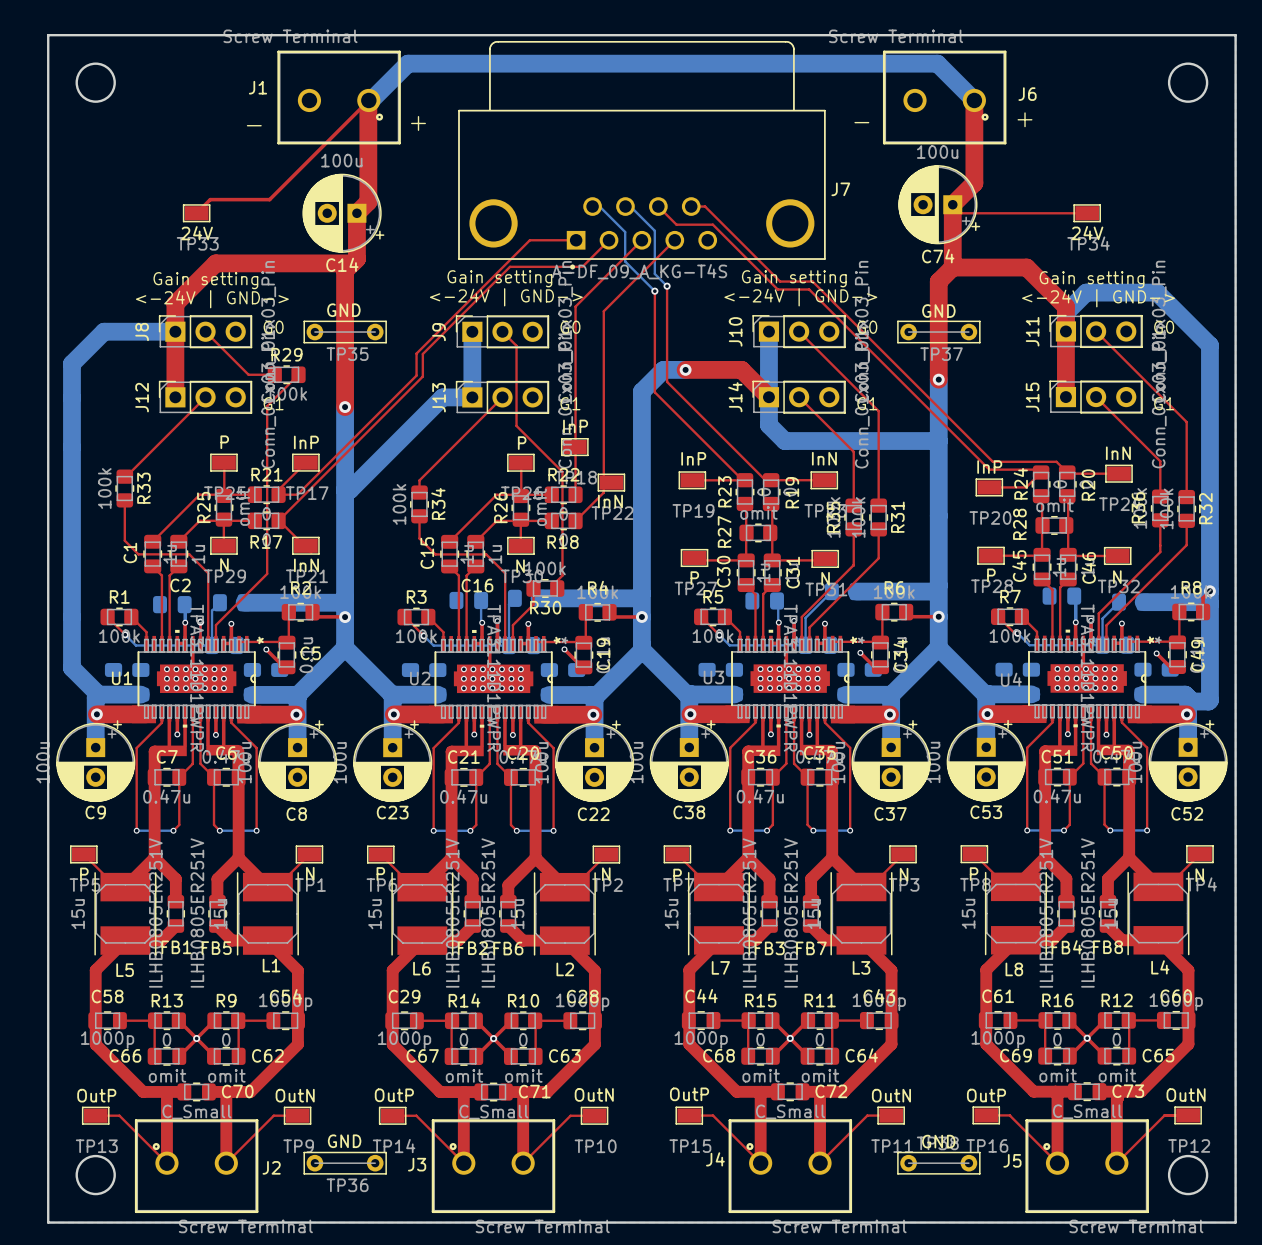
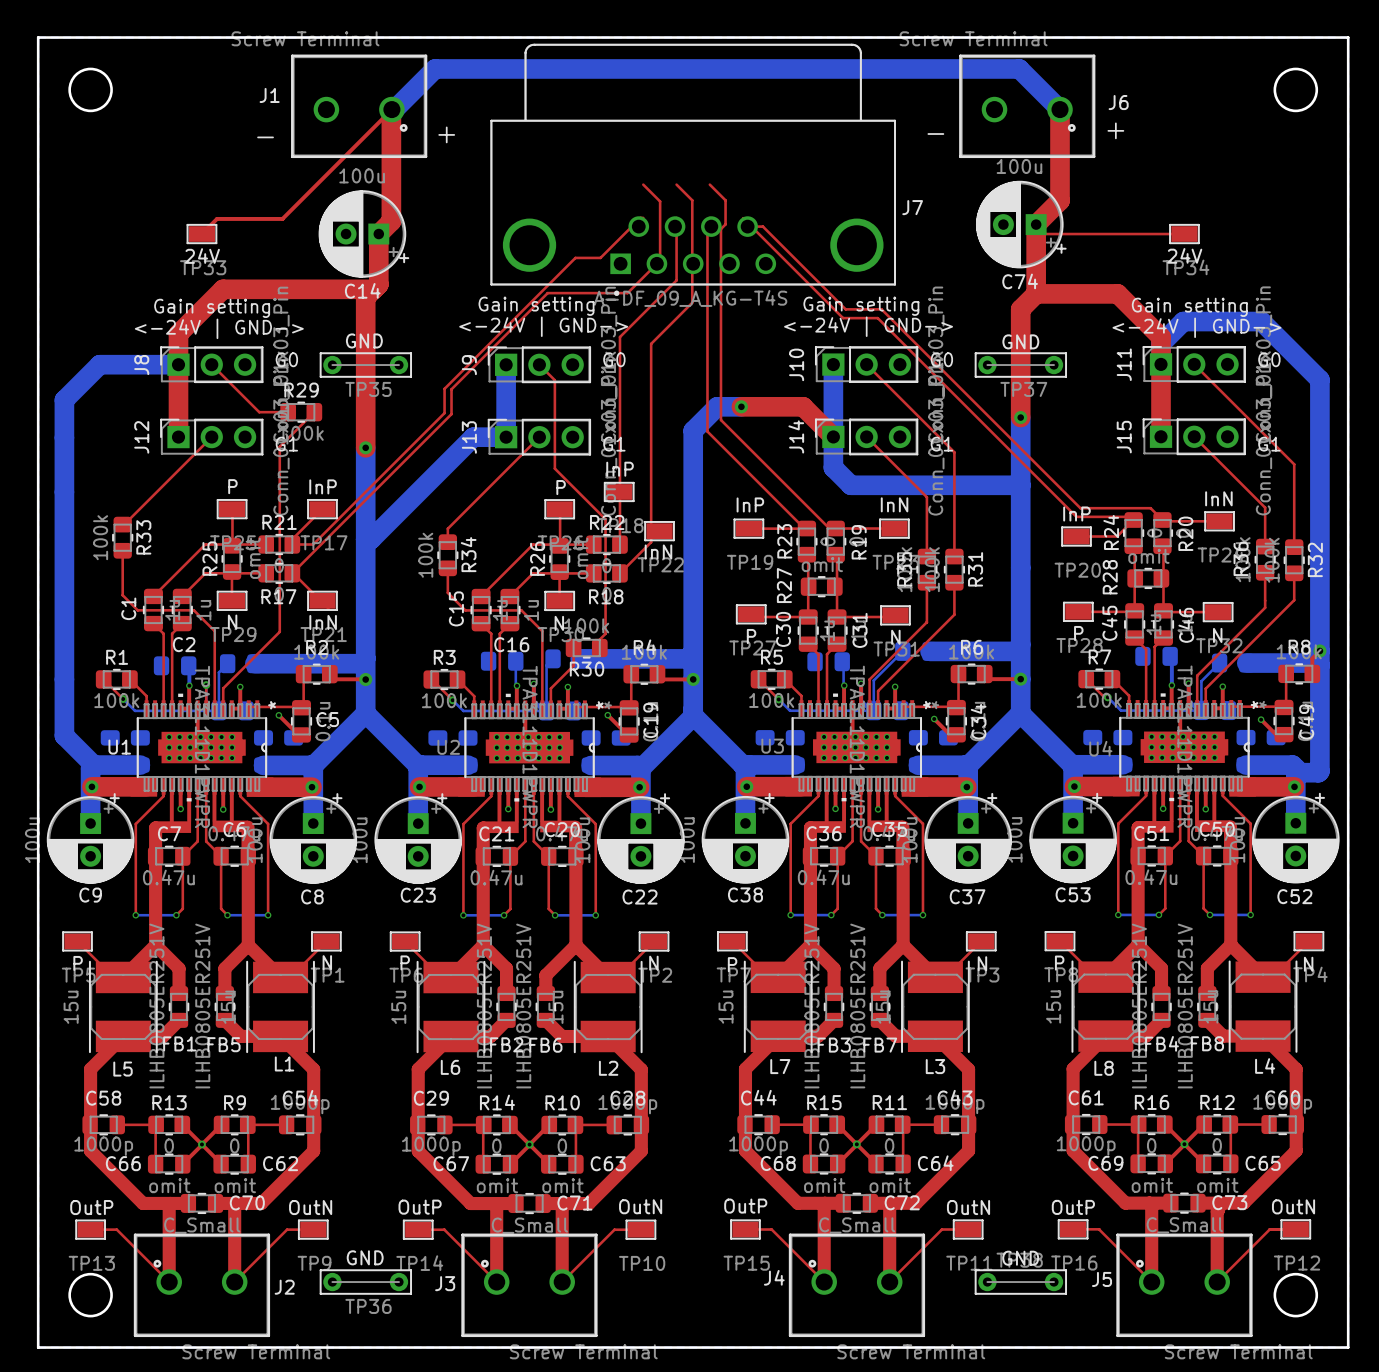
top track: none -> (643, 184) (660, 201) (660, 260) (656, 263)
top track: none -> (709, 184) (725, 200) (725, 224) (720, 229) (720, 314)
top track: none -> (709, 217) (707, 220) (707, 319)
bottom track: (599, 206) (625, 232) (625, 261) (654, 291) -> none
bottom track: (630, 206) (654, 230) (654, 273) (667, 286) -> none
top track: (658, 206) (676, 224) (712, 224) -> (743, 218) (771, 246)
top track: (529, 240) (576, 240) -> (569, 263) (575, 257) (600, 257) (640, 217) (643, 217)
top track: (641, 240) (626, 255) -> (676, 217) (676, 280)
top track: (674, 240) (603, 312) -> (676, 184) (692, 200) (692, 302) (651, 343)
via: (667, 286) -> none
via: (654, 291) -> none

